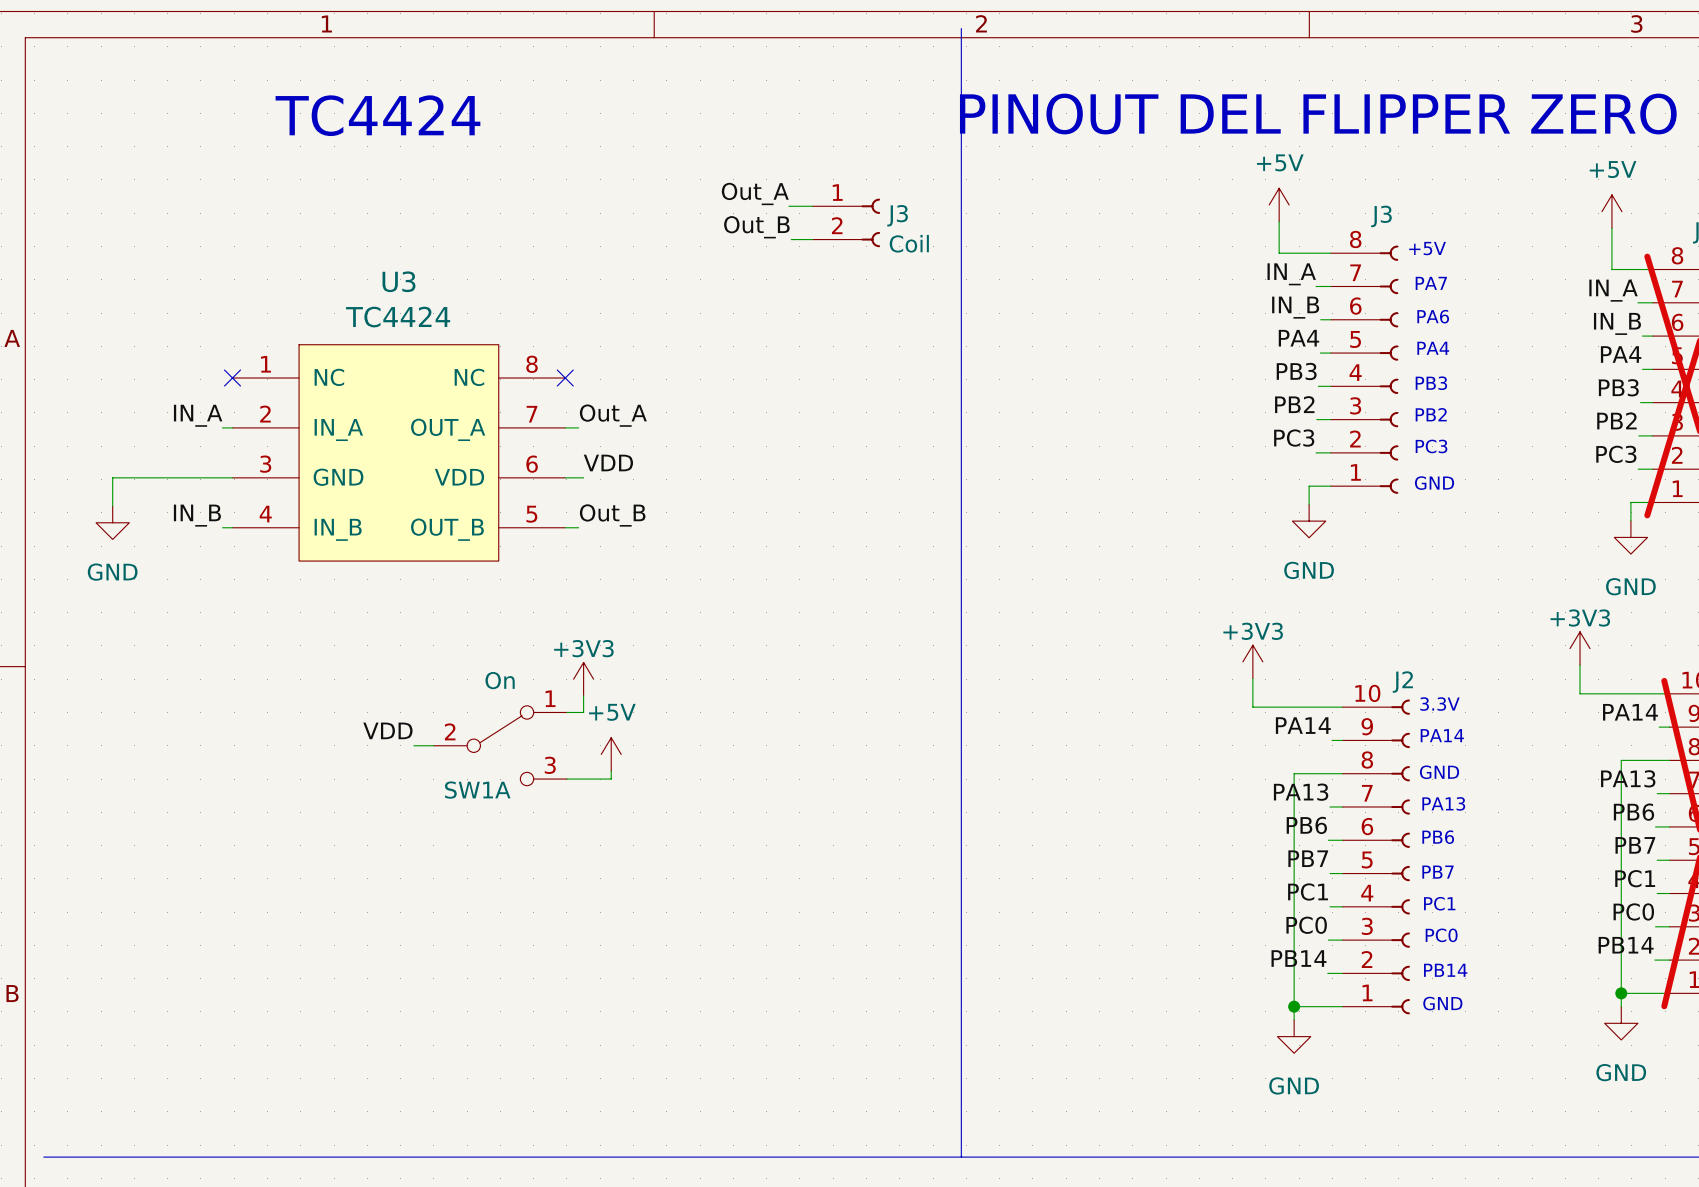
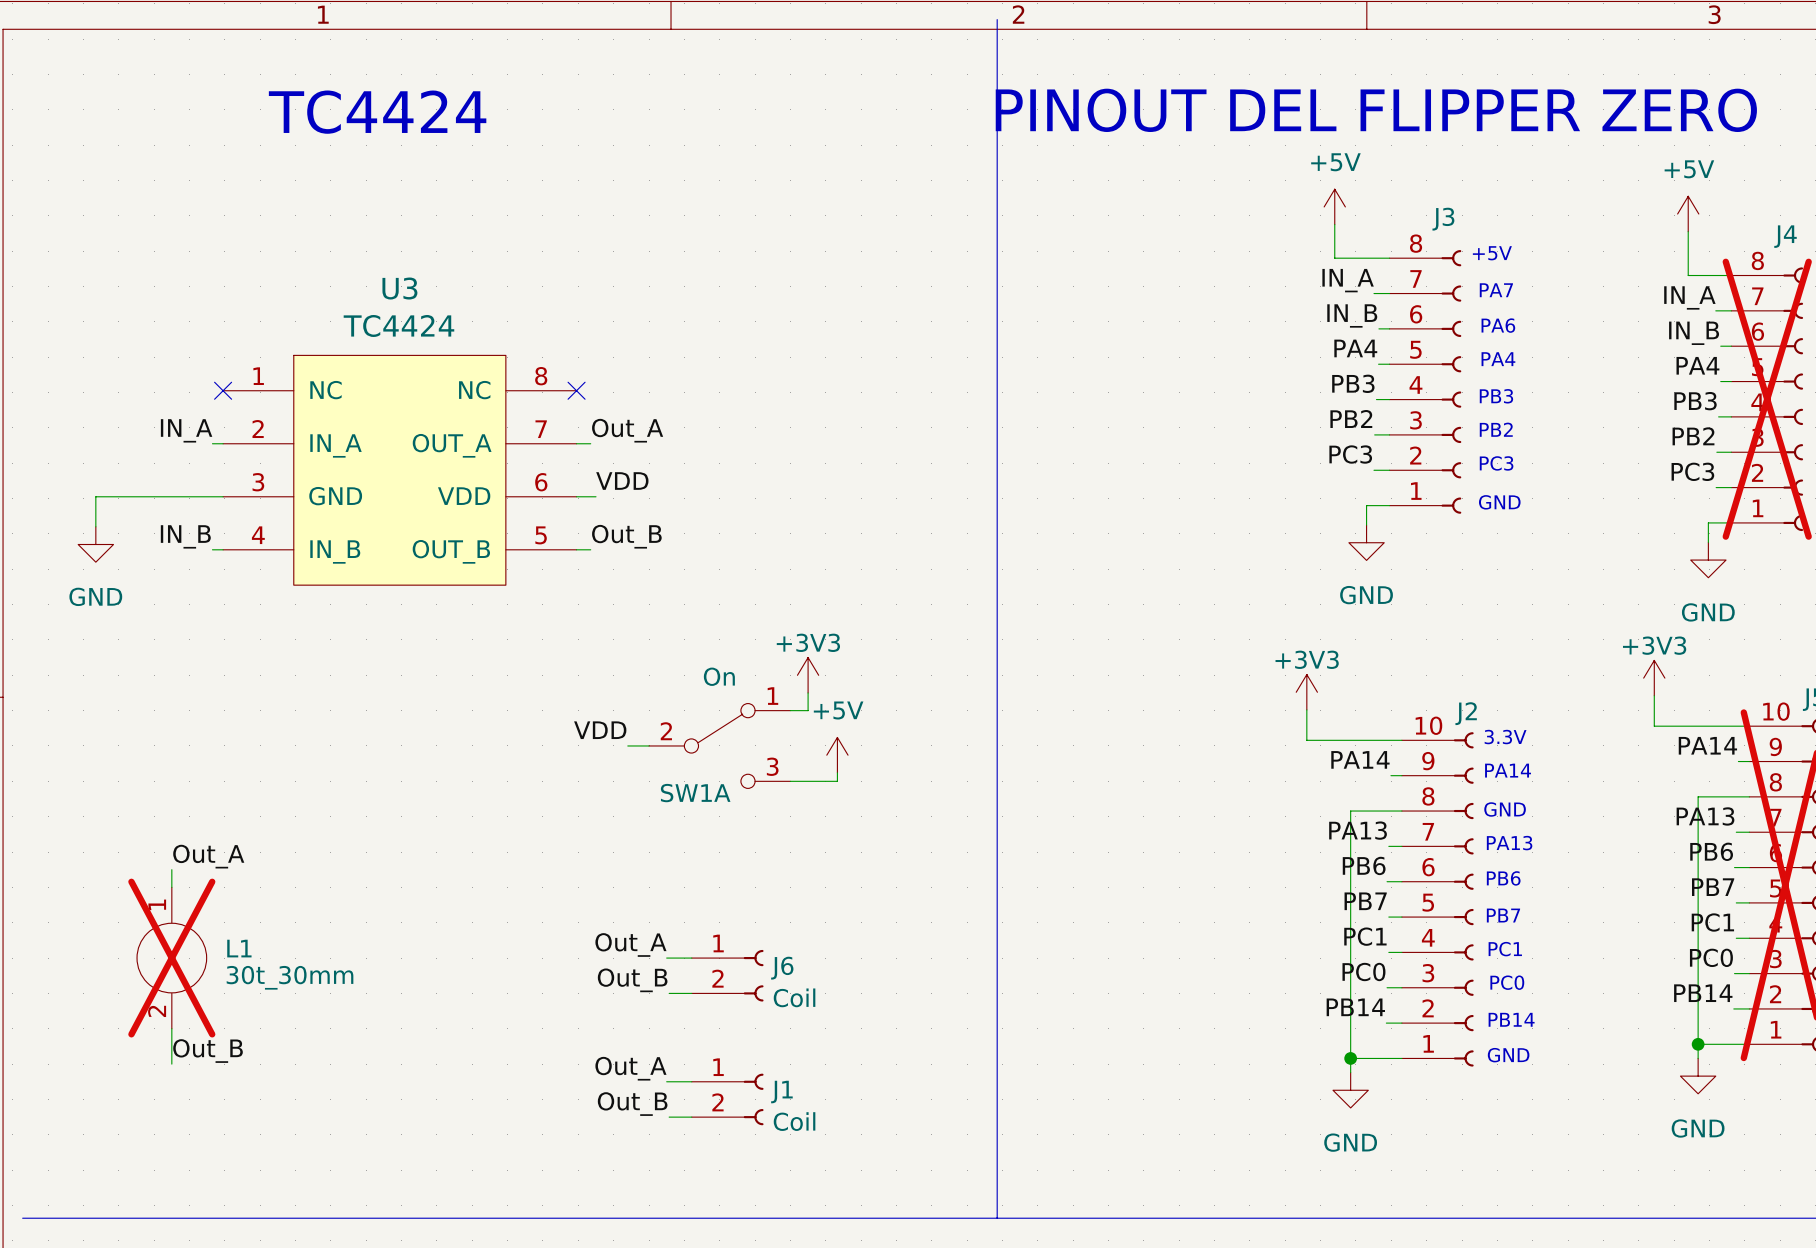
label: Out_A (755, 193) -> none
wire: (788, 206) (812, 206) -> none
J3: Coil (846, 222) -> none
label: Out_B (756, 227) -> none
wire: (791, 239) (812, 239) -> none
power symbol position: +3V3 (583, 679) -> +3V3 (808, 675)
wire: (583, 695) (583, 712) (566, 712) -> (808, 692) (808, 710) (790, 710)
label position: VDD (387, 730) -> VDD (600, 730)
wire: (413, 745) (433, 745) -> (627, 745) (649, 745)
SW1A position: (500, 745) -> (719, 745)
power symbol position: +5V (611, 754) -> +5V (837, 755)
wire: (611, 771) (611, 779) (566, 779) -> (837, 772) (837, 781) (790, 781)
label: none -> Out_A (208, 856)
wire: none -> (171, 869) (171, 887)
label: none -> Out_A (630, 944)
L1: none -> 30t_30mm (171, 958)
wire: none -> (666, 958) (691, 958)
J6: none -> Coil (727, 975)
label: none -> Out_B (632, 980)
wire: none -> (669, 993) (691, 993)
wire: none -> (171, 1028) (171, 1064)
label: none -> Out_B (208, 1051)
label: none -> Out_A (630, 1068)
wire: none -> (666, 1081) (691, 1081)
J1: none -> Coil (727, 1099)
label: none -> Out_B (632, 1104)
wire: none -> (669, 1117) (691, 1117)

